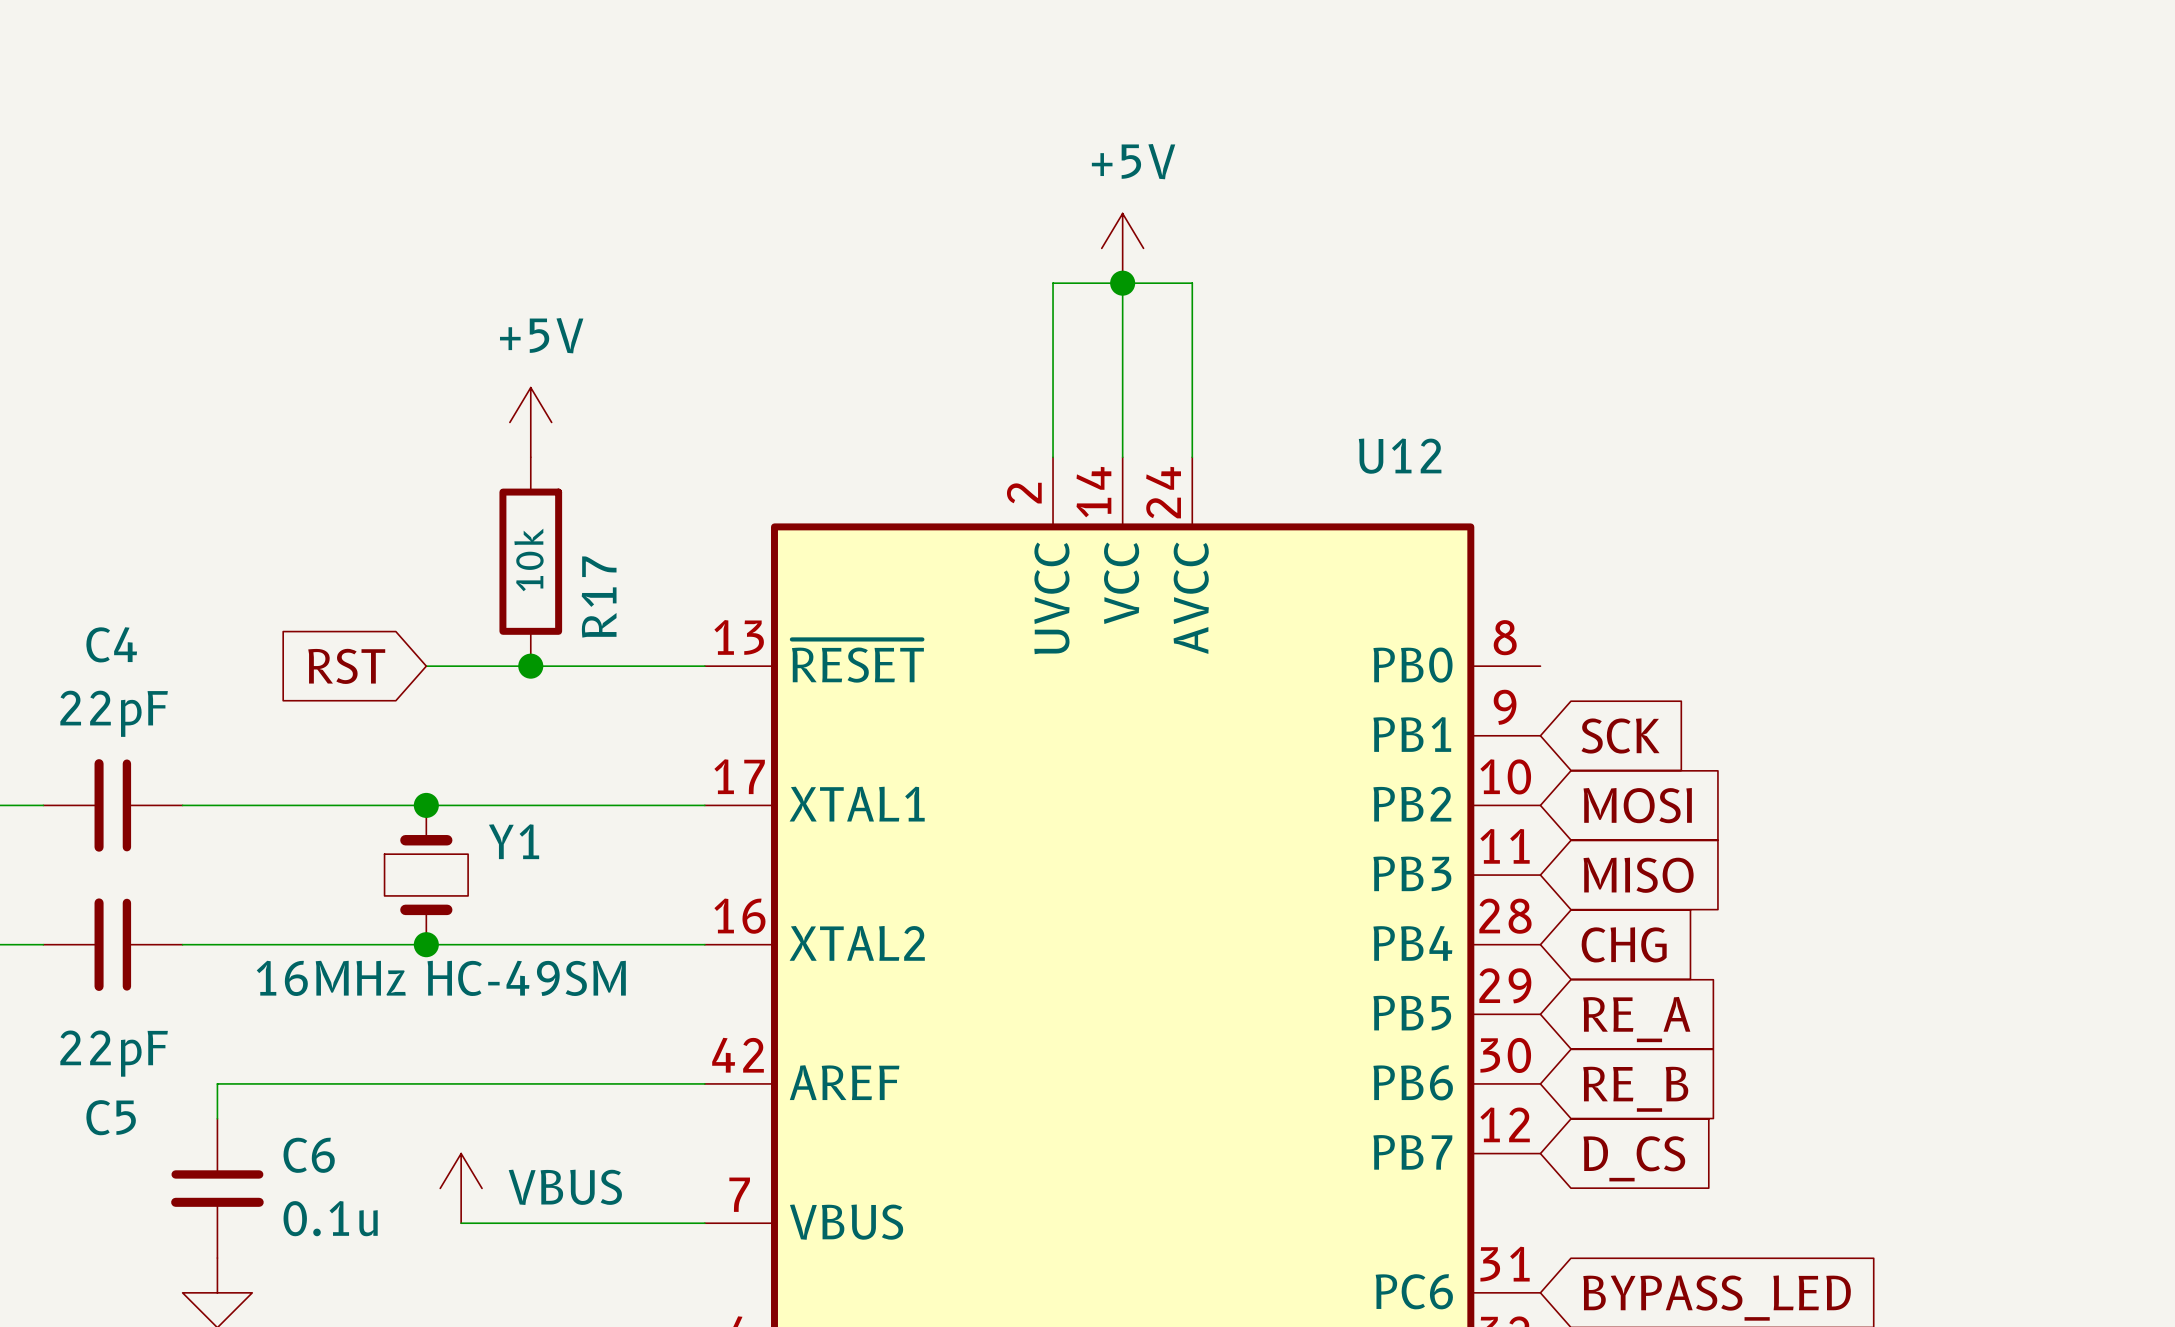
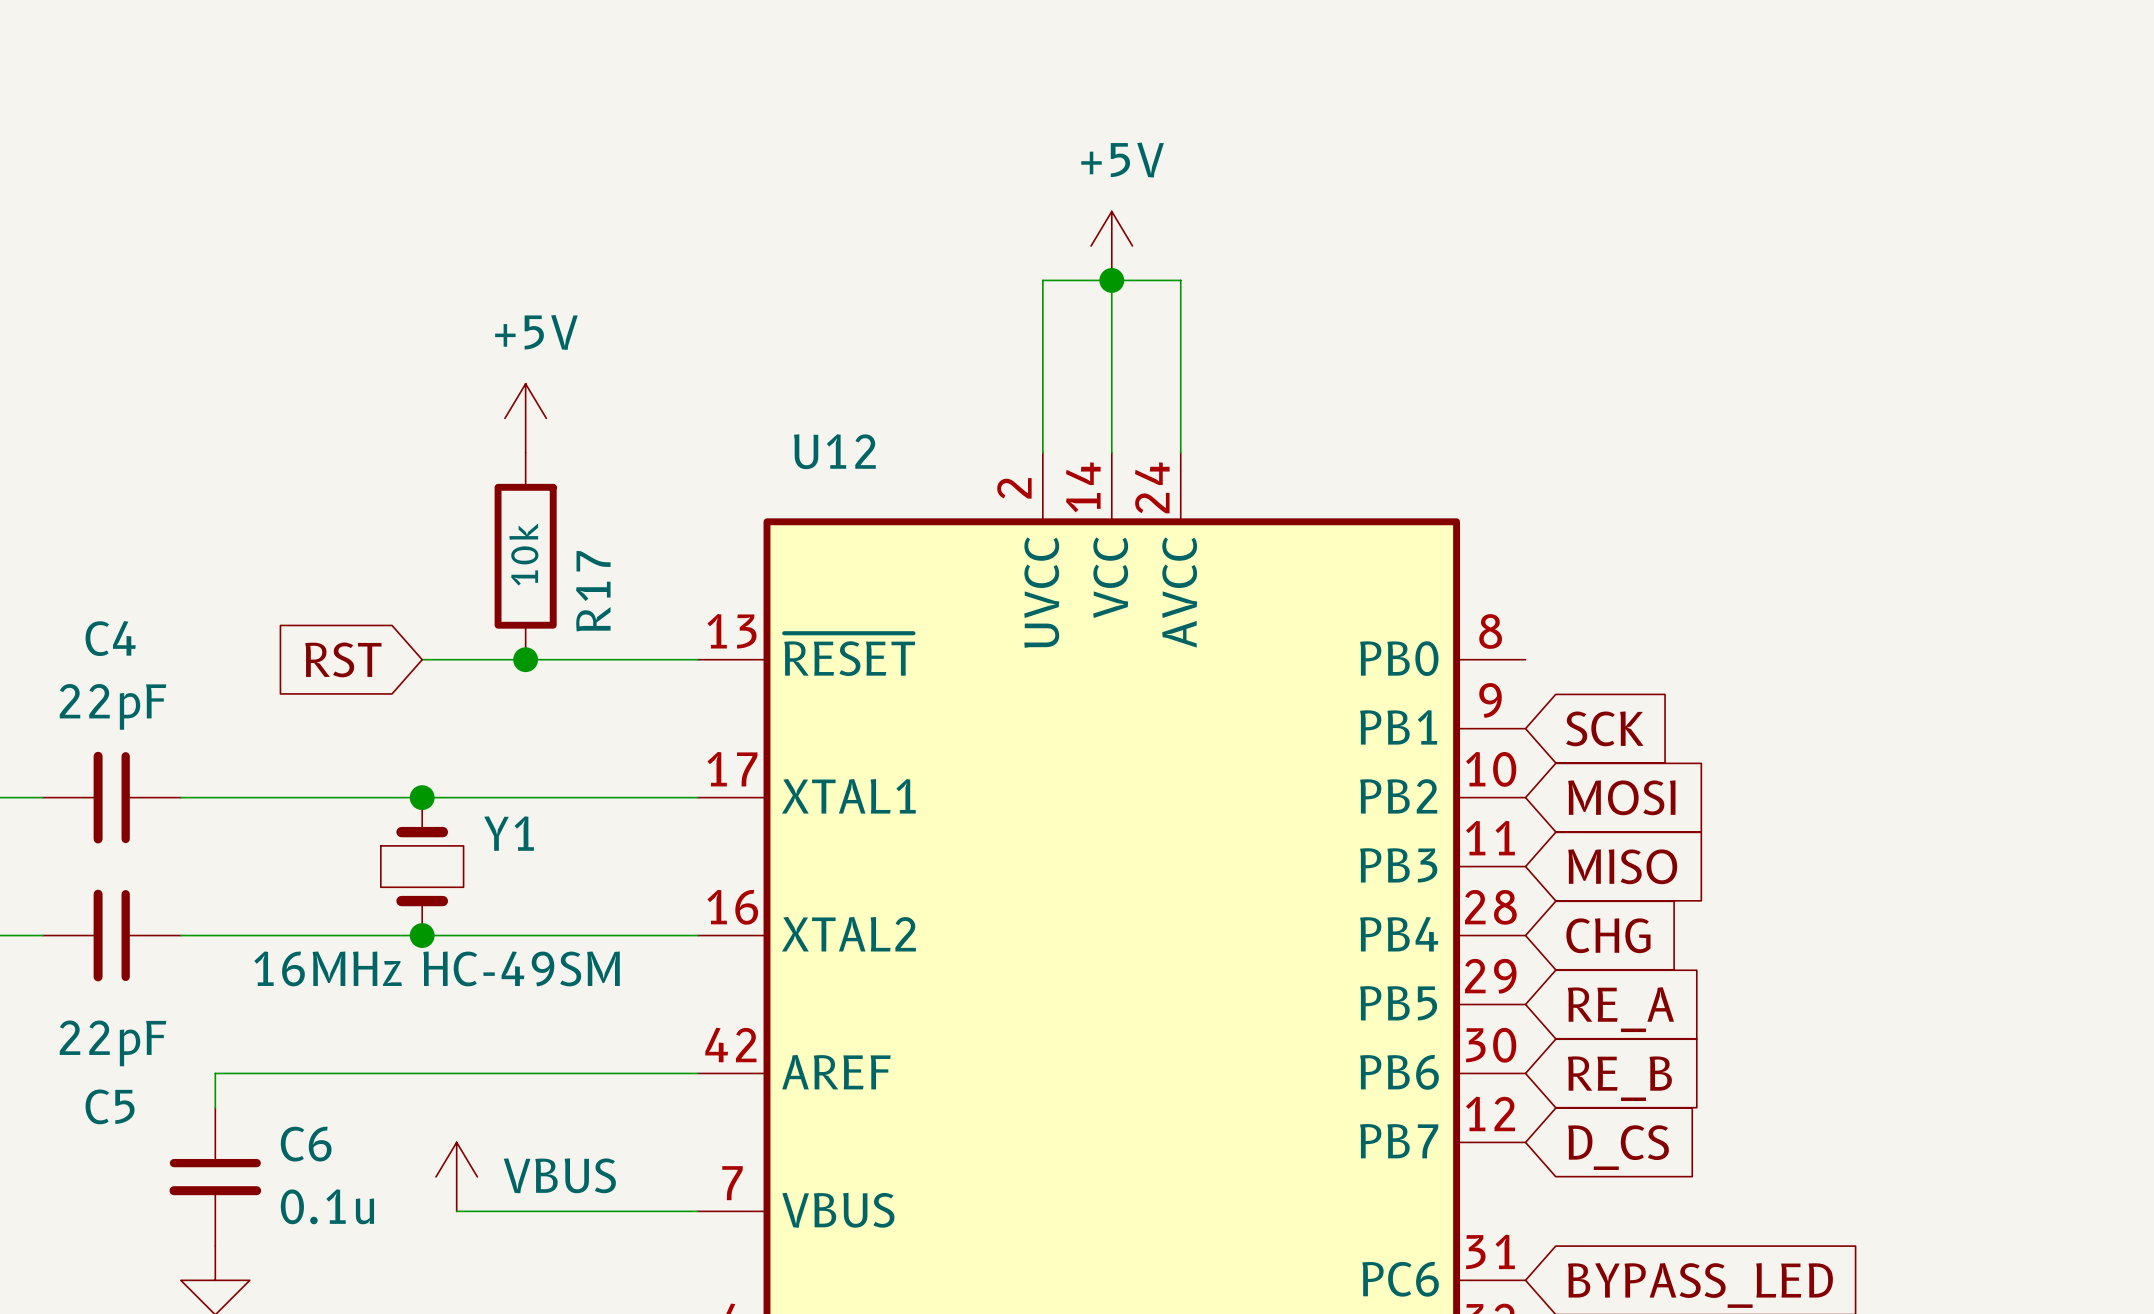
U12 name position: U12 (1400, 456) -> U12 (834, 451)

